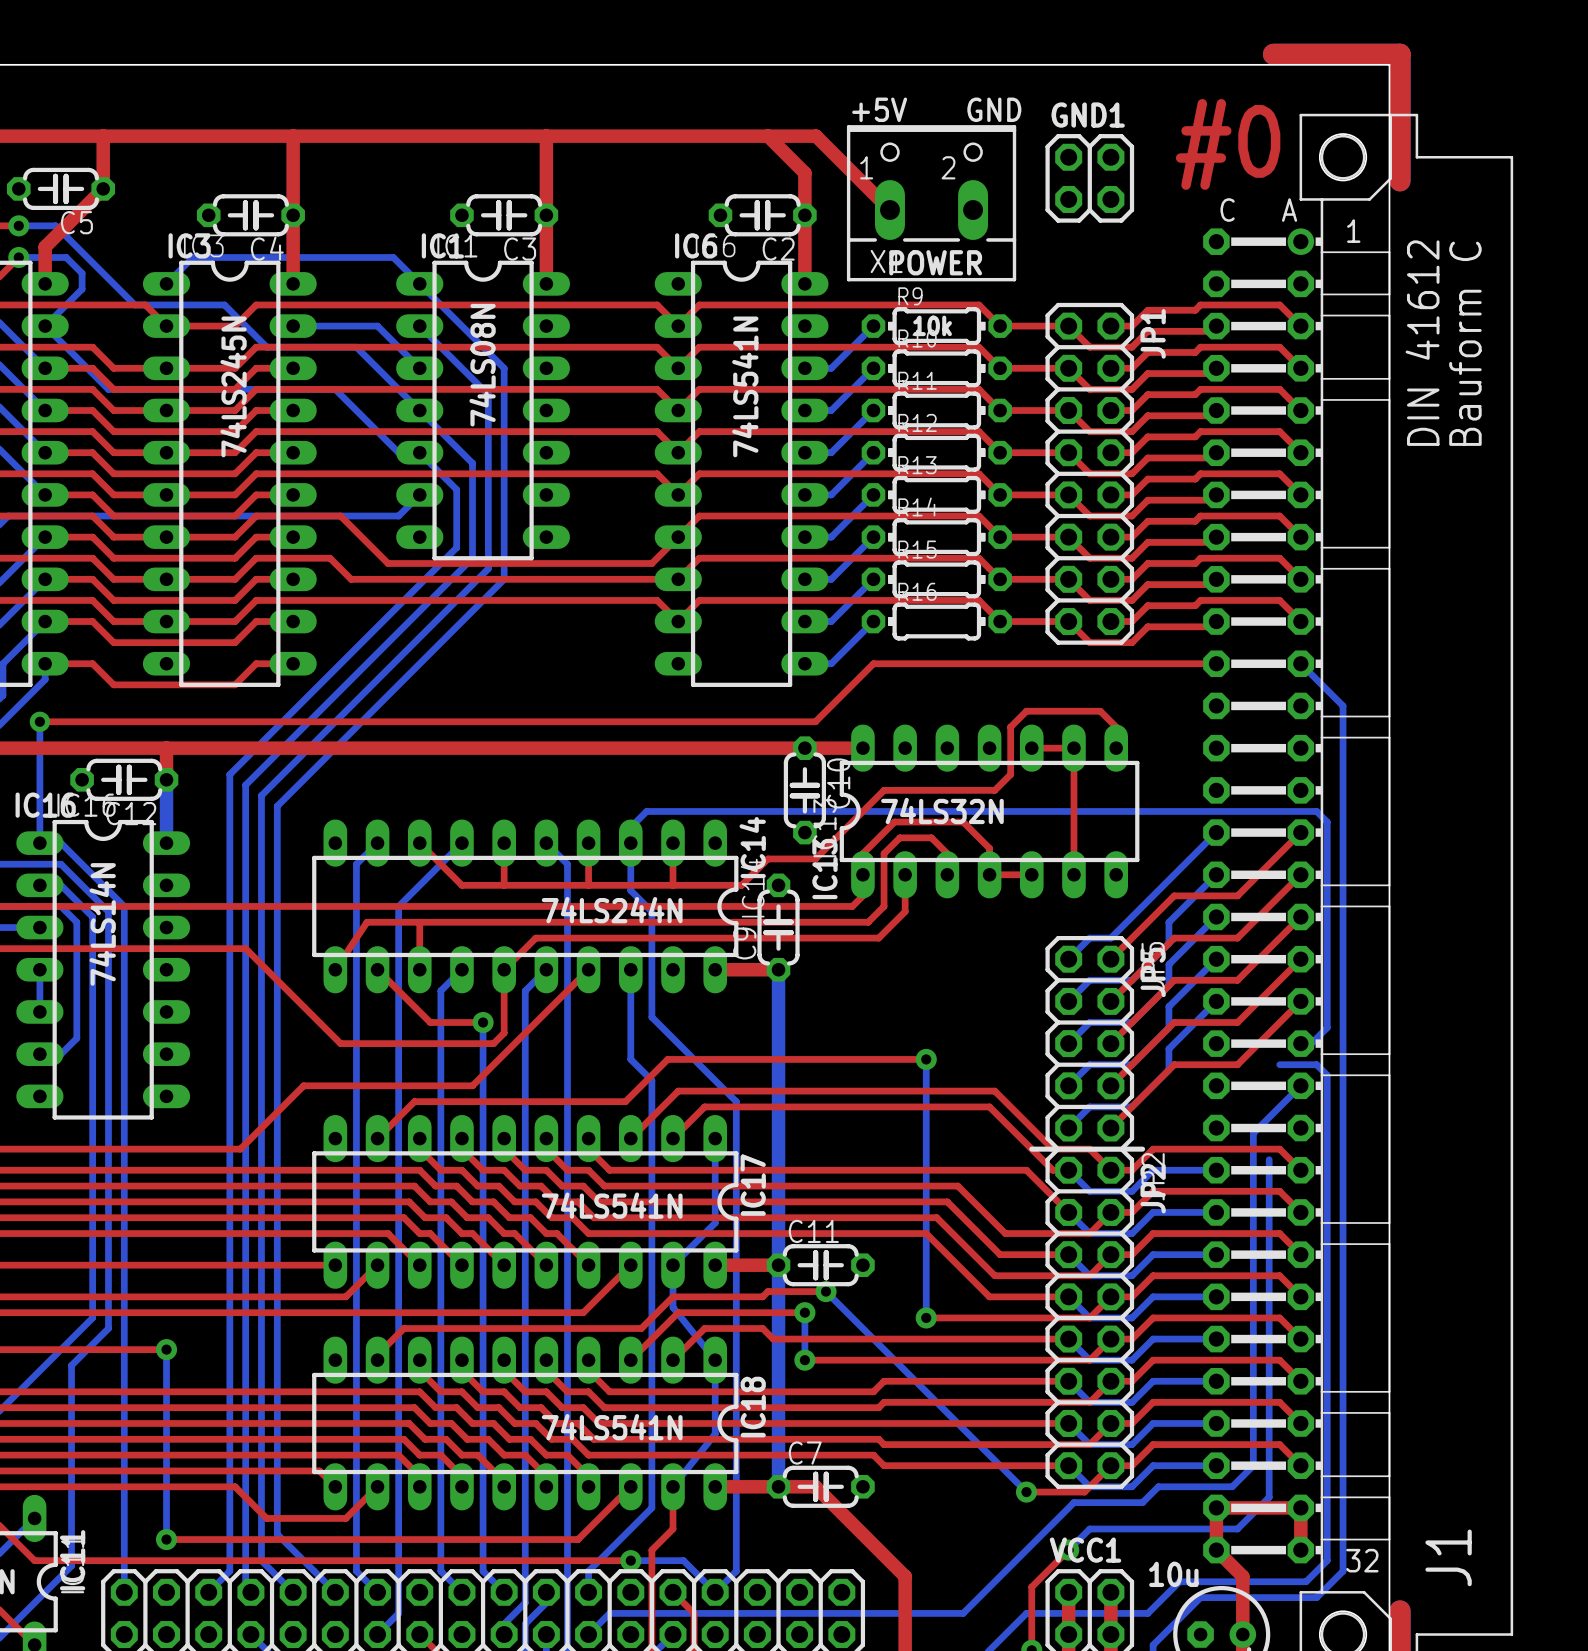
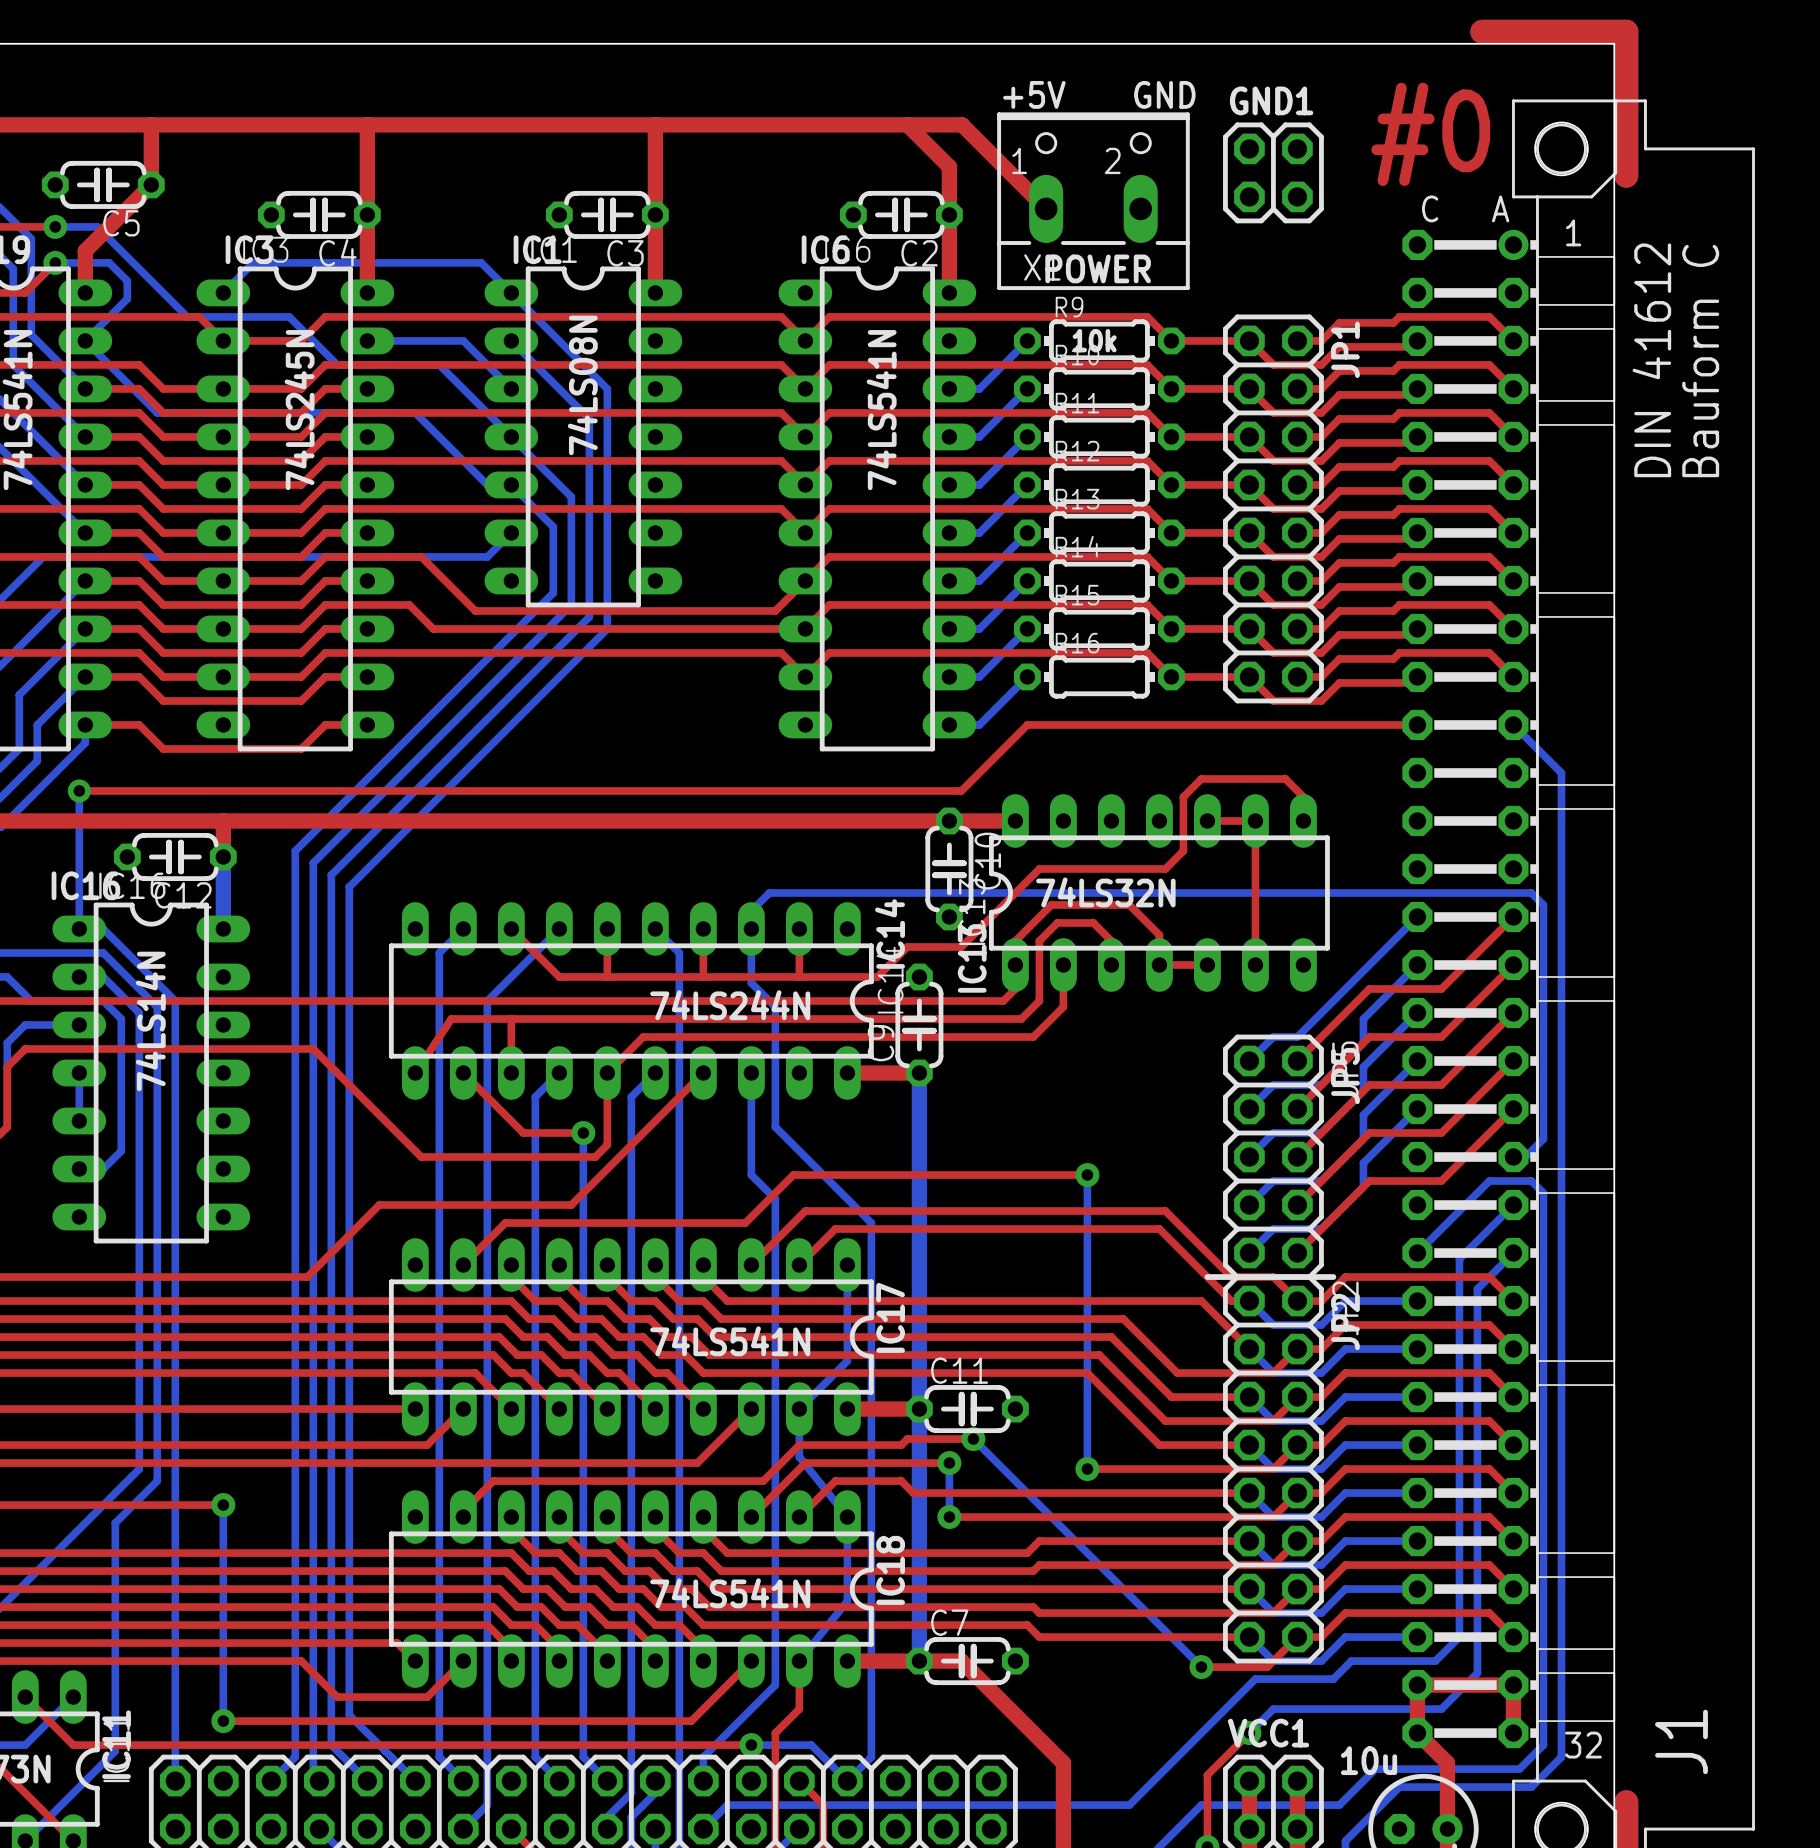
bottom track: none -> (1489, 1181) (1417, 1253)
bottom track: none -> (1513, 1253) (1477, 1289)

